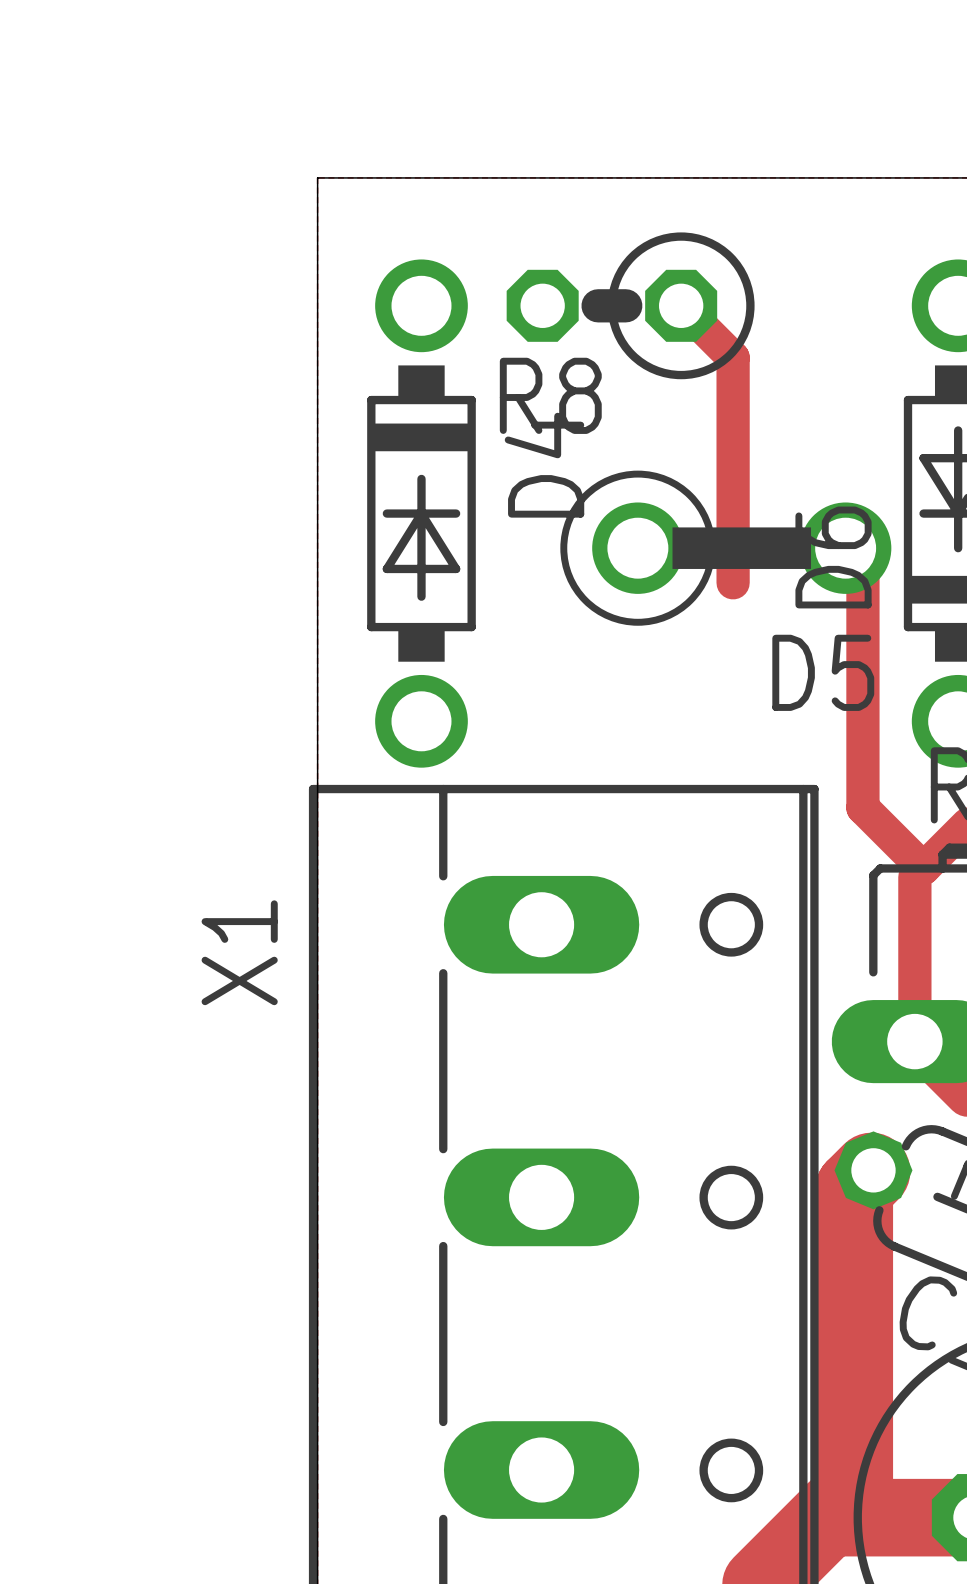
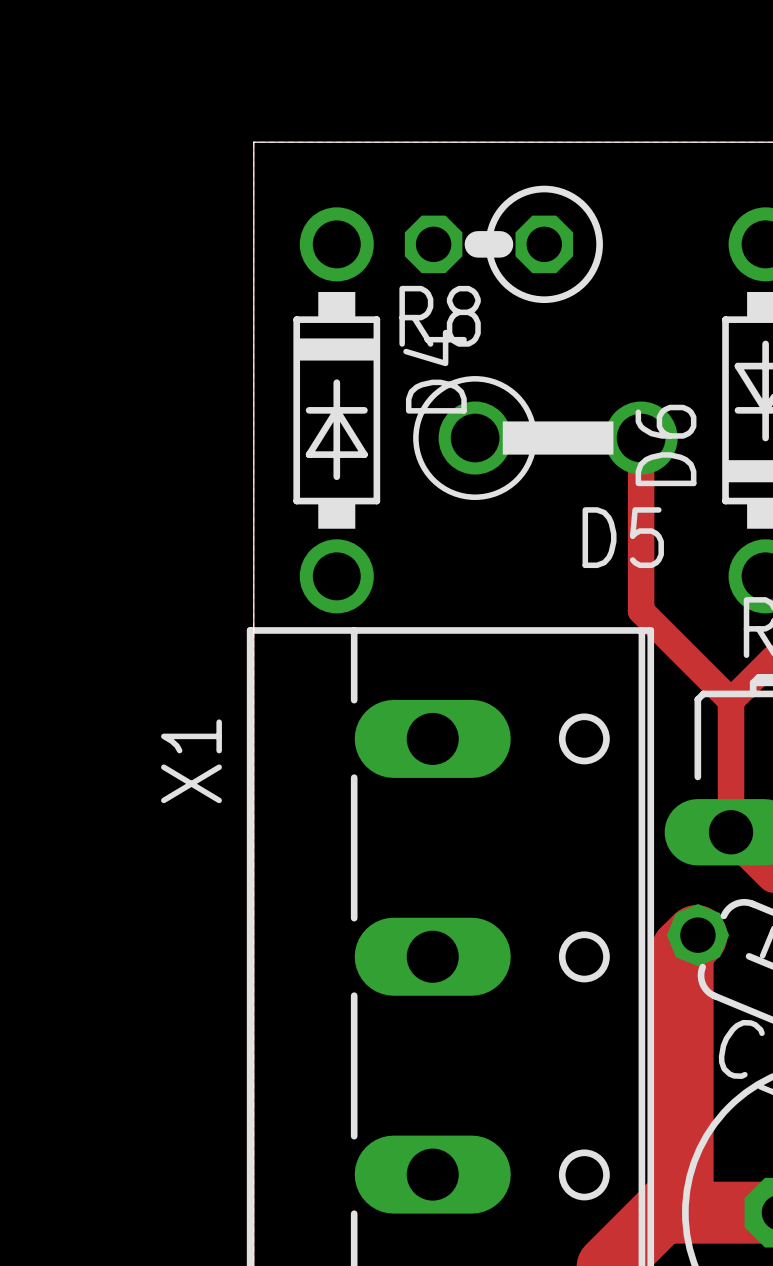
track: (681, 305) (733, 357) (733, 582) -> none
D5 position: (725, 548) -> (545, 438)
track: (845, 548) (862, 548) (862, 807) (923, 868) -> (641, 438) (641, 610) (731, 700) (737, 693)

